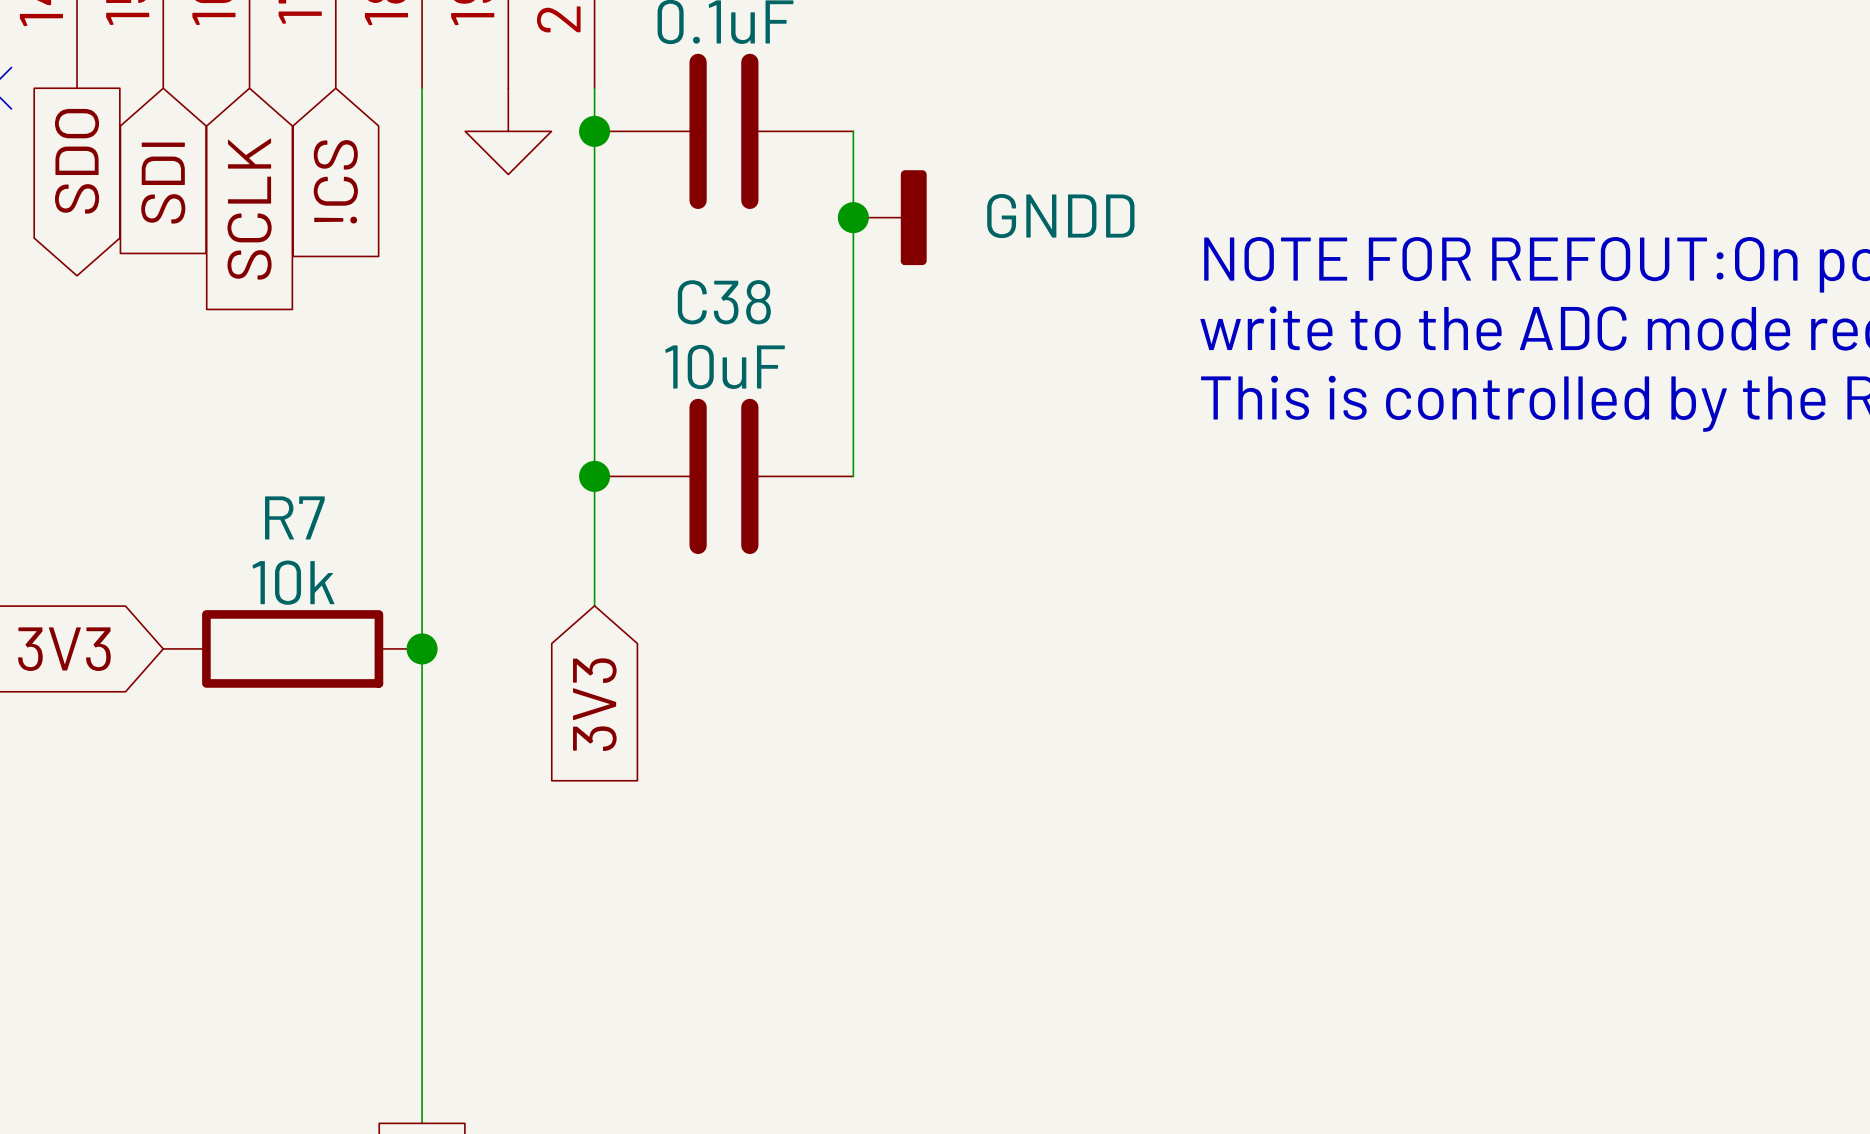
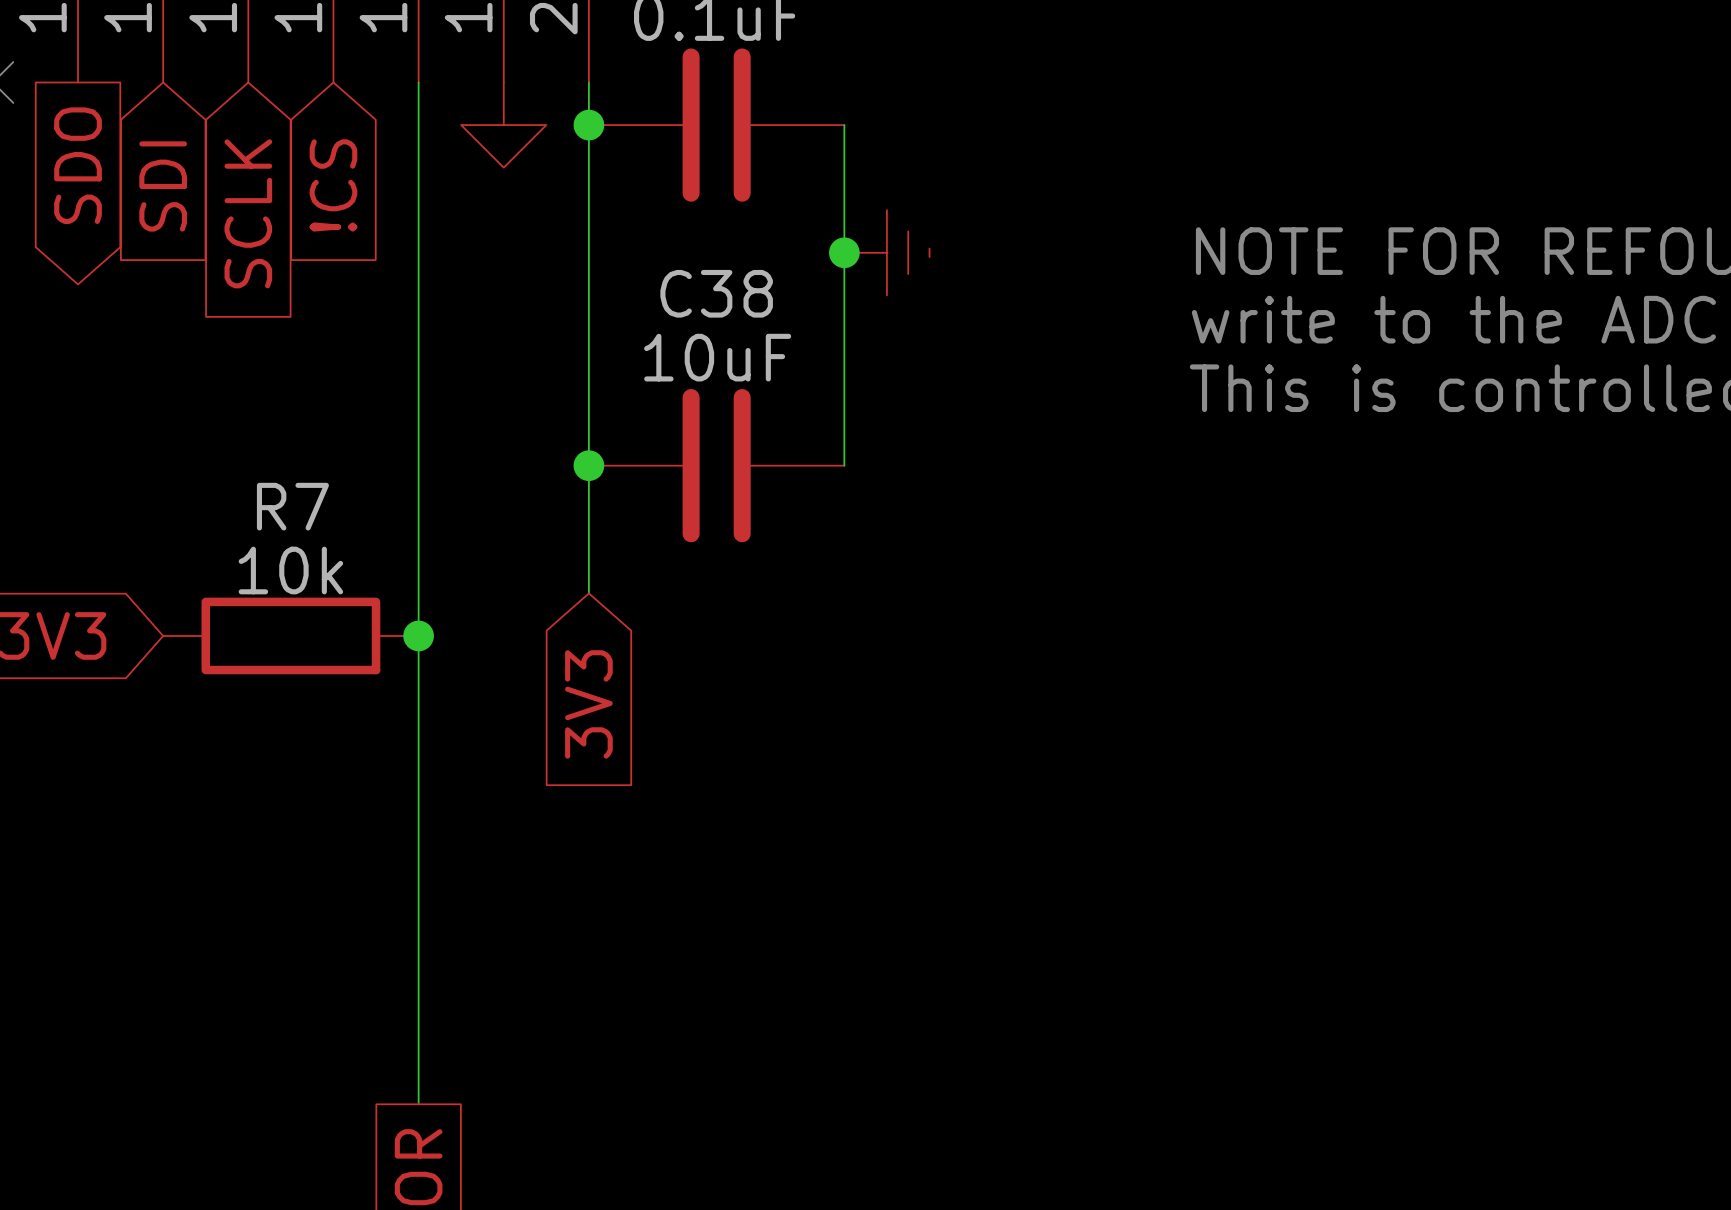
junction position: (853, 217) -> (844, 252)
power symbol: GNDD (890, 217) -> none
power symbol: none -> (886, 252)

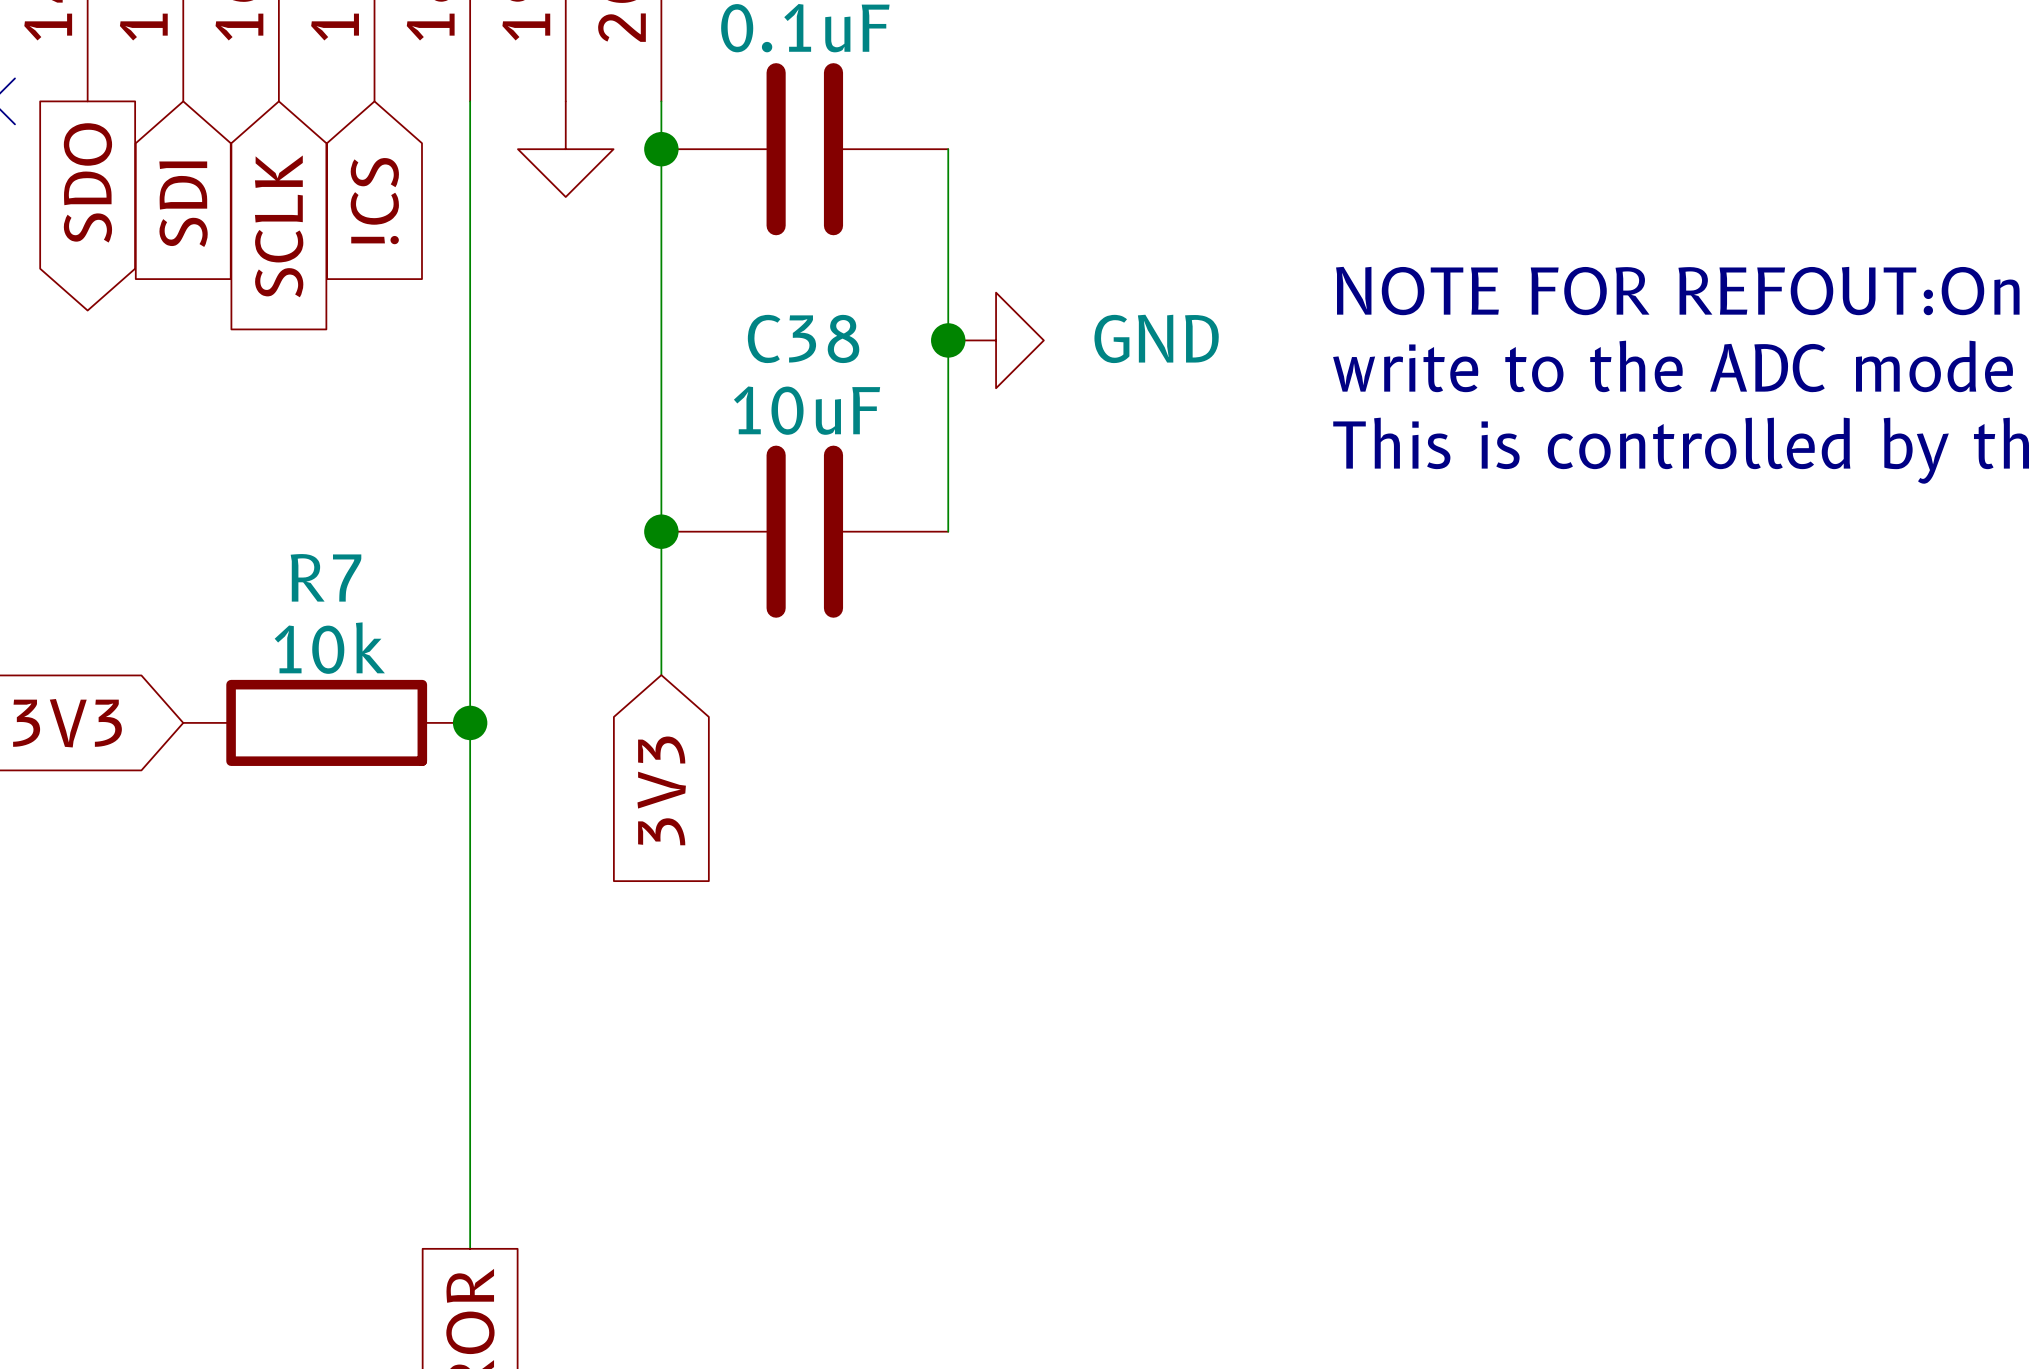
junction position: (844, 252) -> (948, 340)
power symbol: (886, 252) -> none
power symbol: none -> GND (996, 340)

